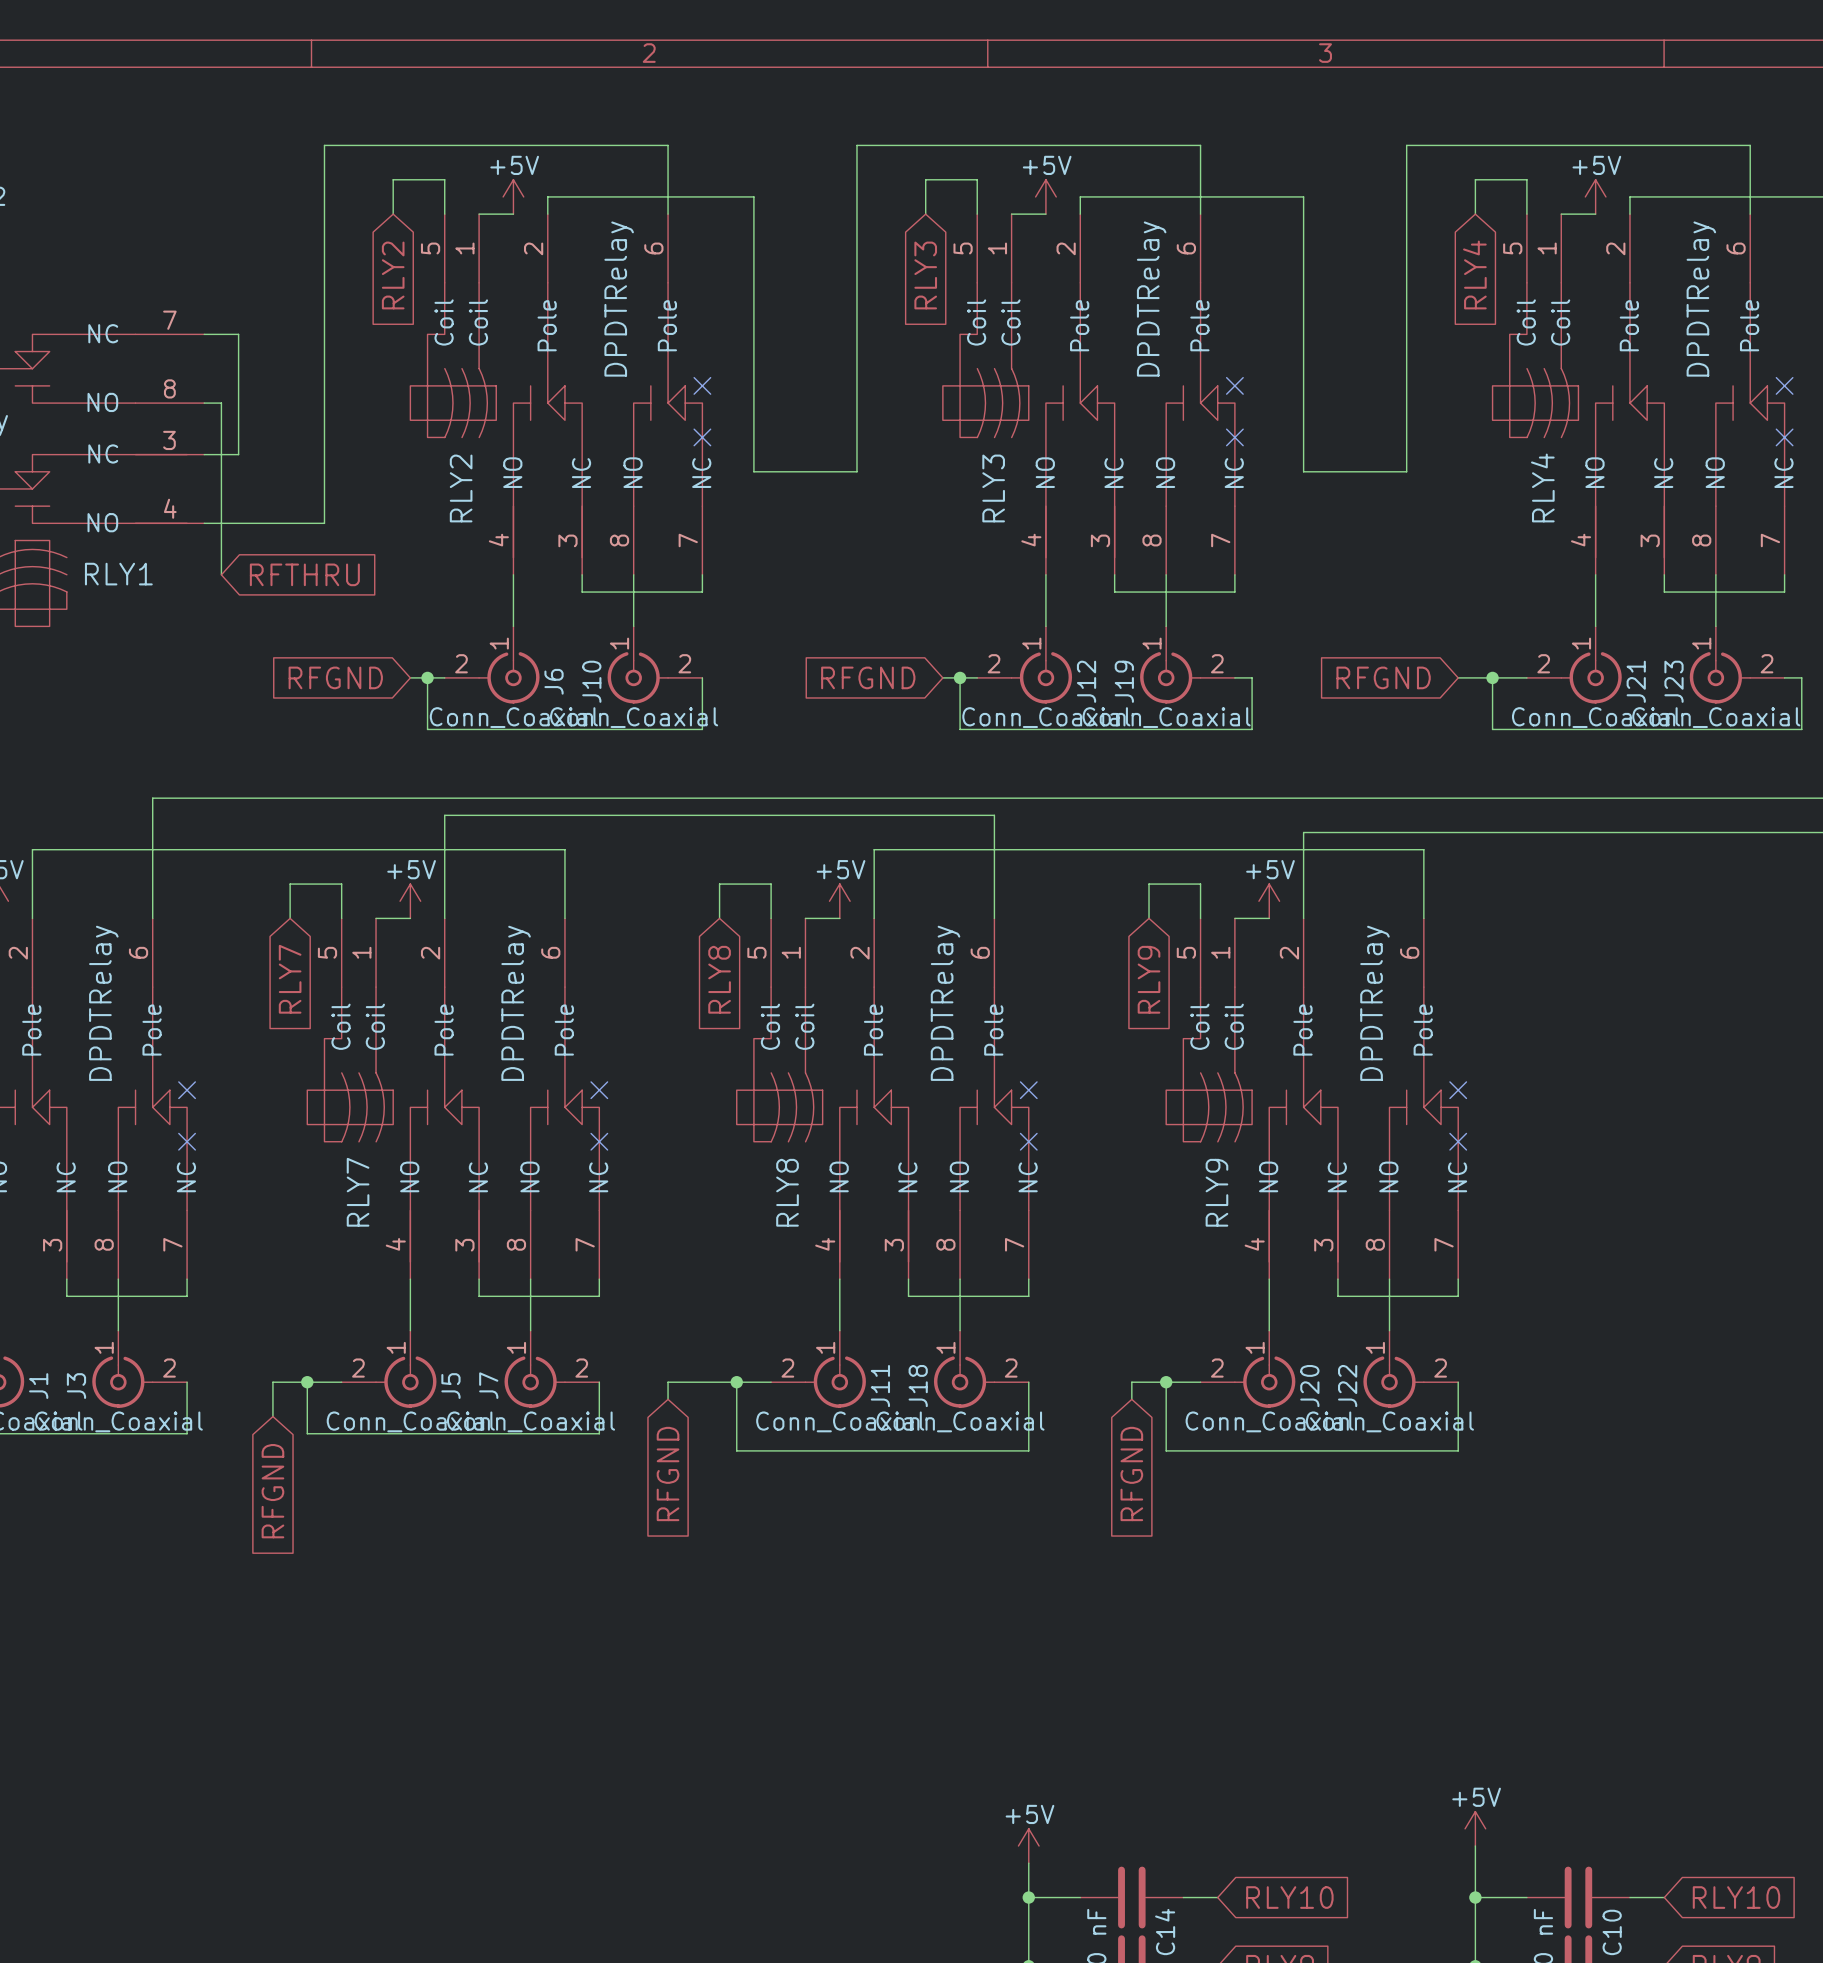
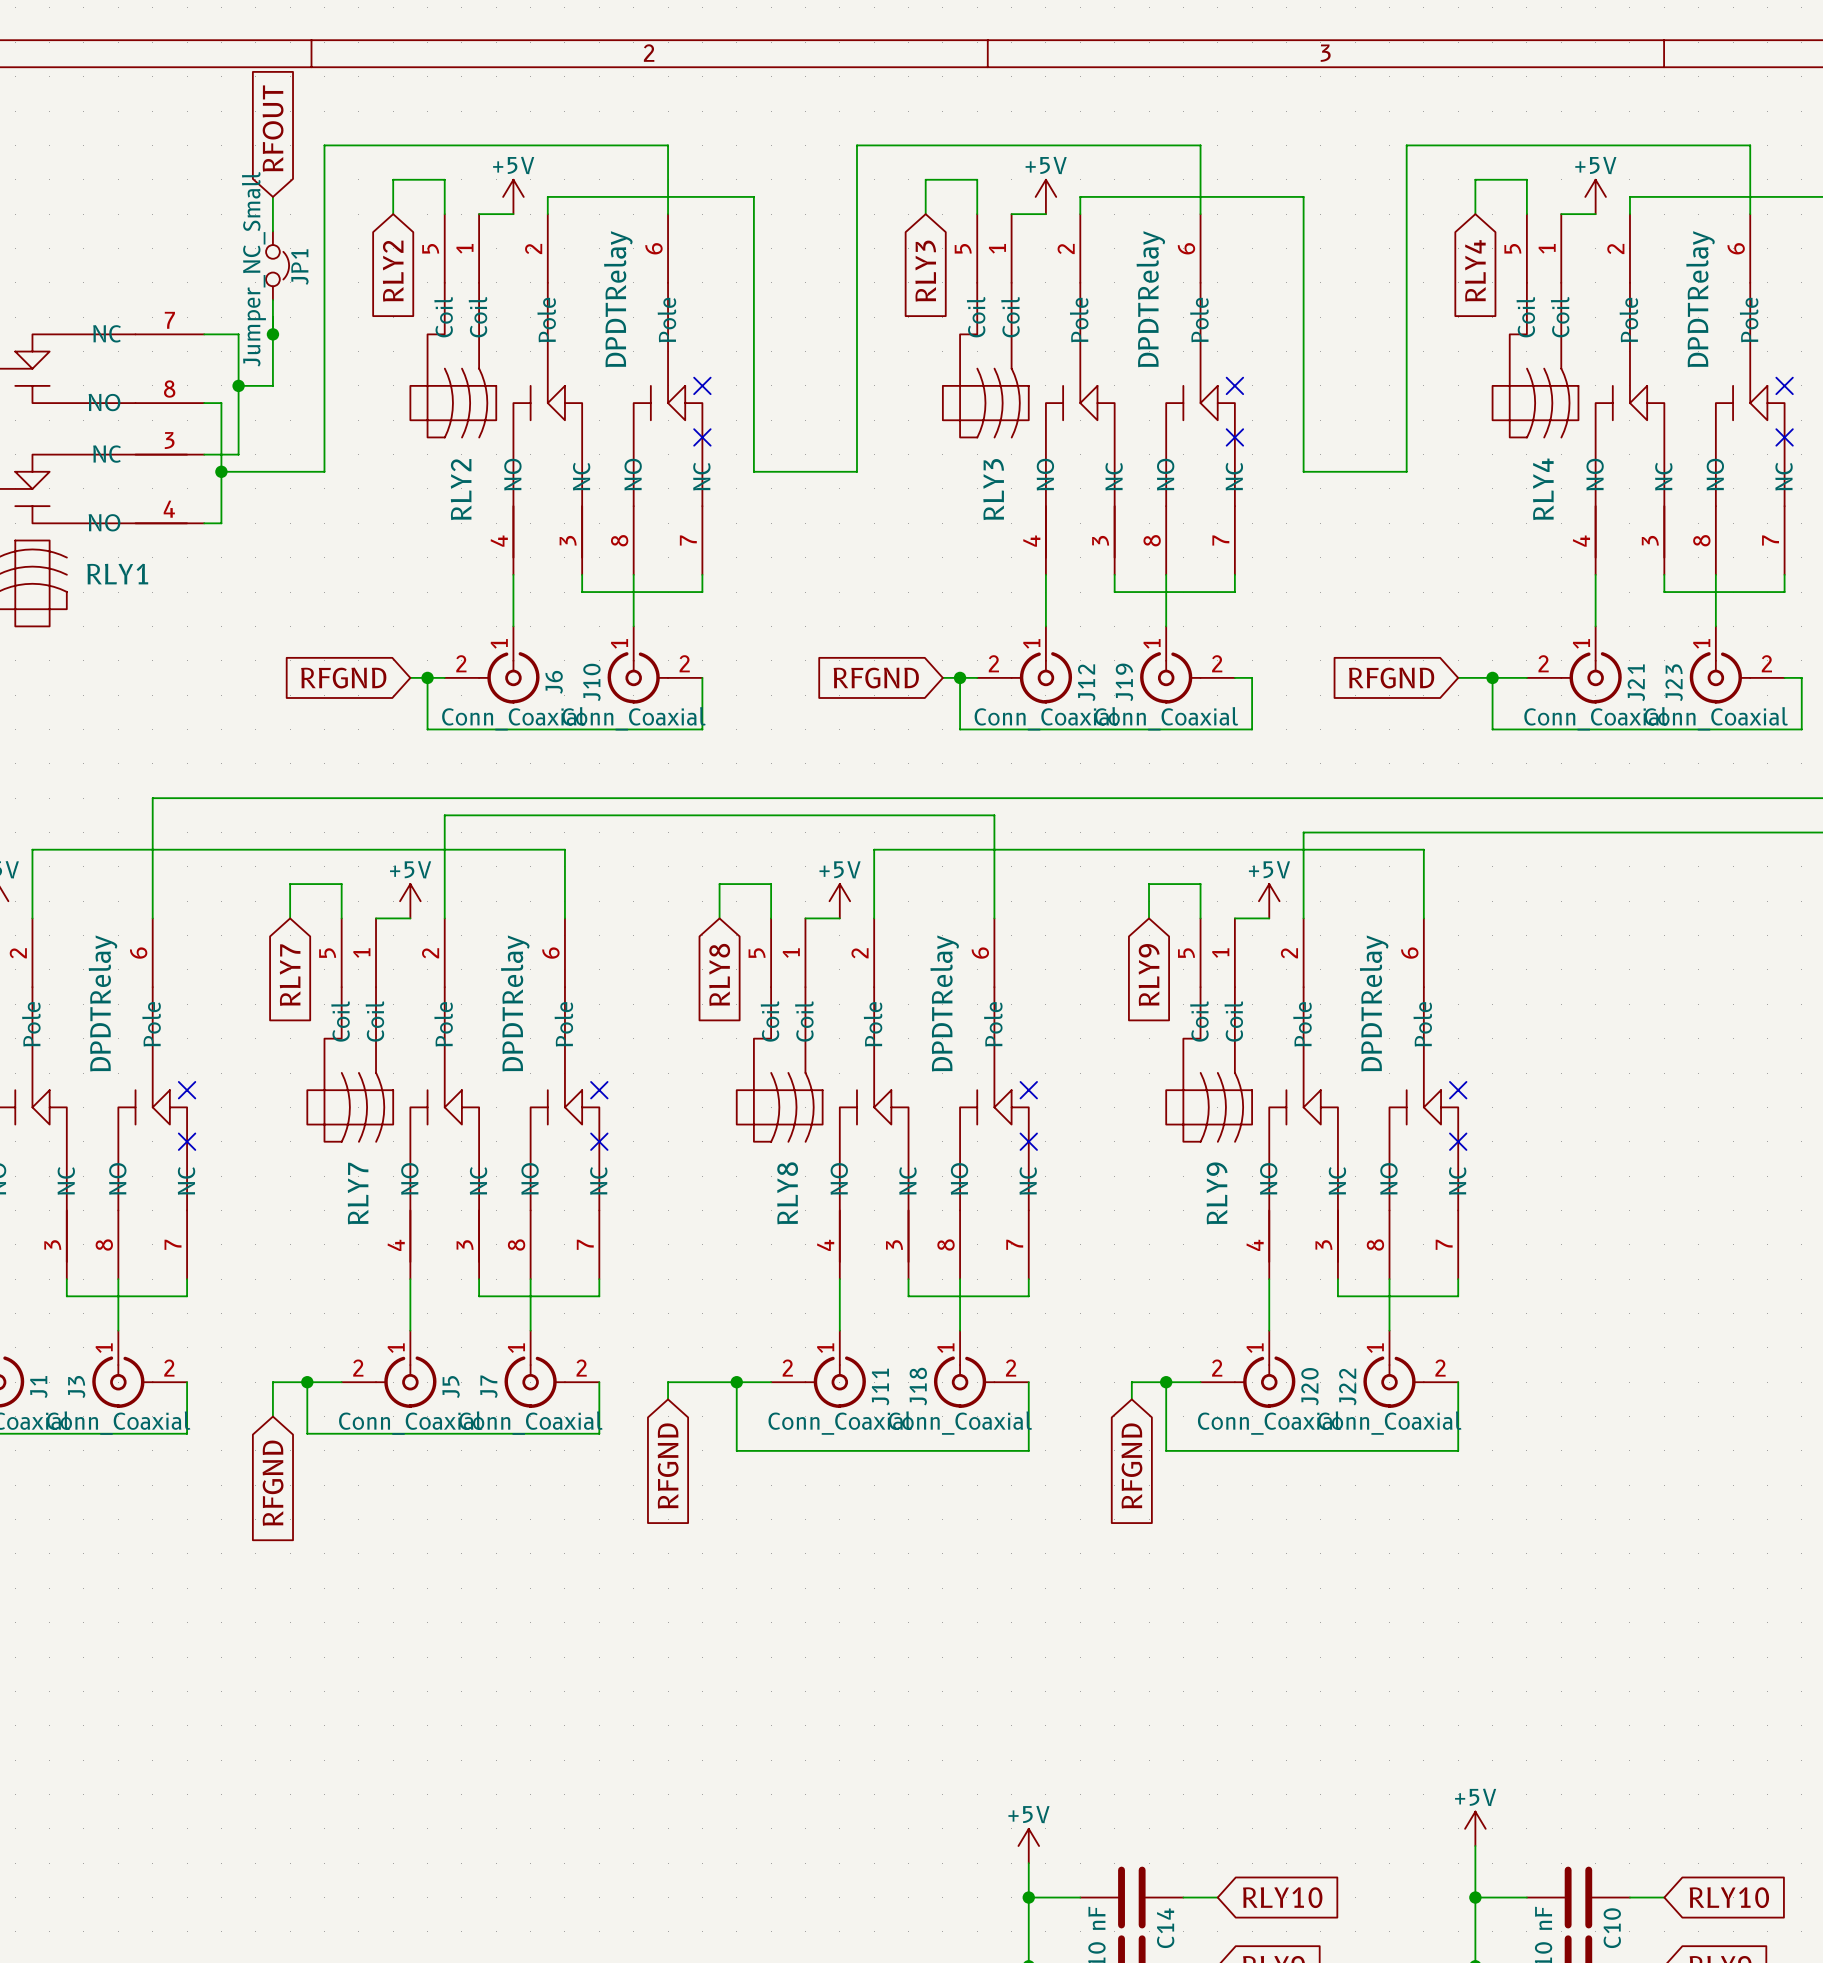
global label: none -> RFOUT (273, 128)
wire: none -> (272, 196) (272, 231)
JP1: none -> Jumper_NC_Small (277, 265)
wire: none -> (272, 300) (272, 385) (238, 385)
junction: none -> (272, 334)
junction: none -> (238, 385)
junction: none -> (221, 471)
wire: (324, 471) (324, 523) (221, 523) (221, 574) -> (324, 471) (221, 471)
global label: RFTHRU (304, 574) -> none

